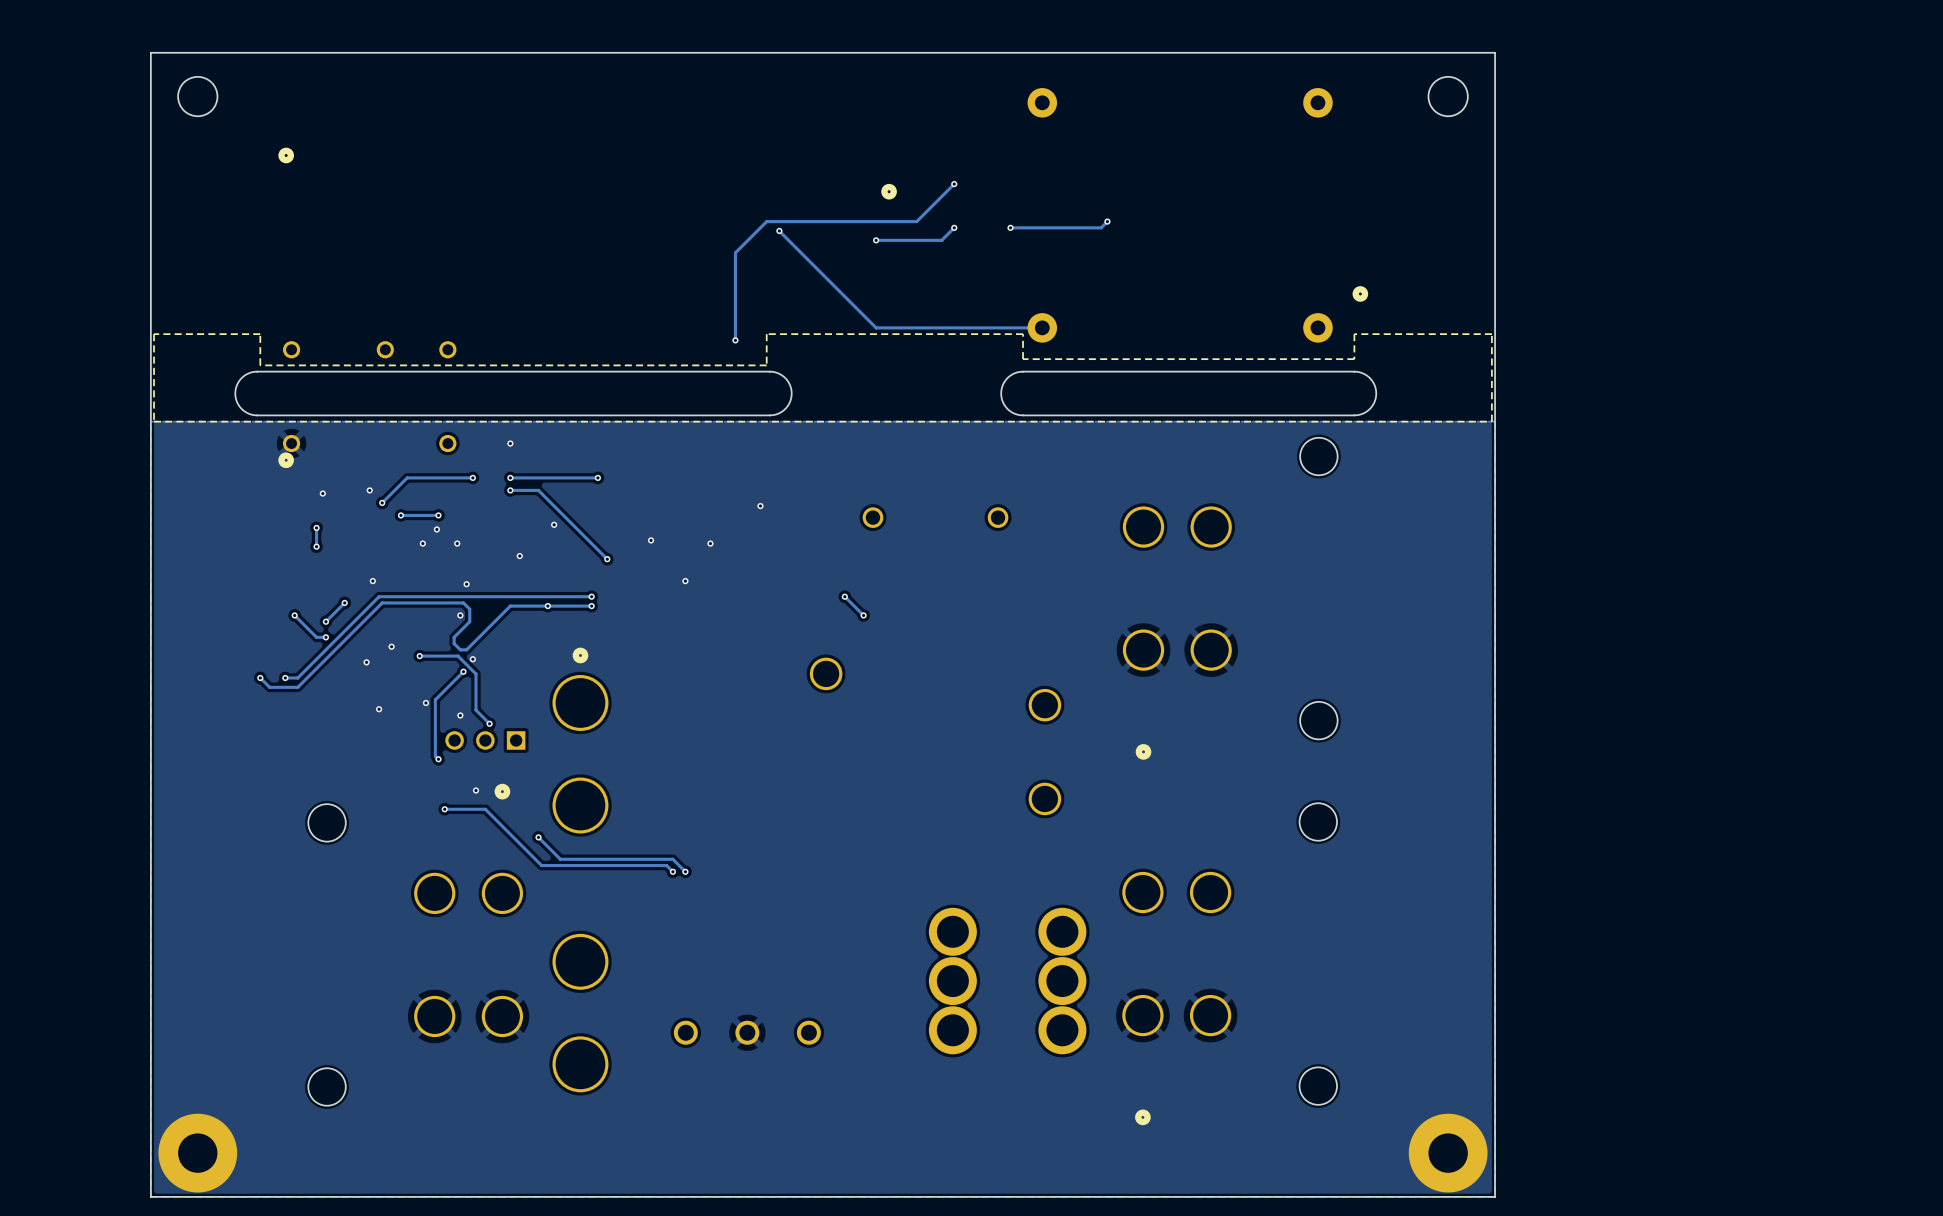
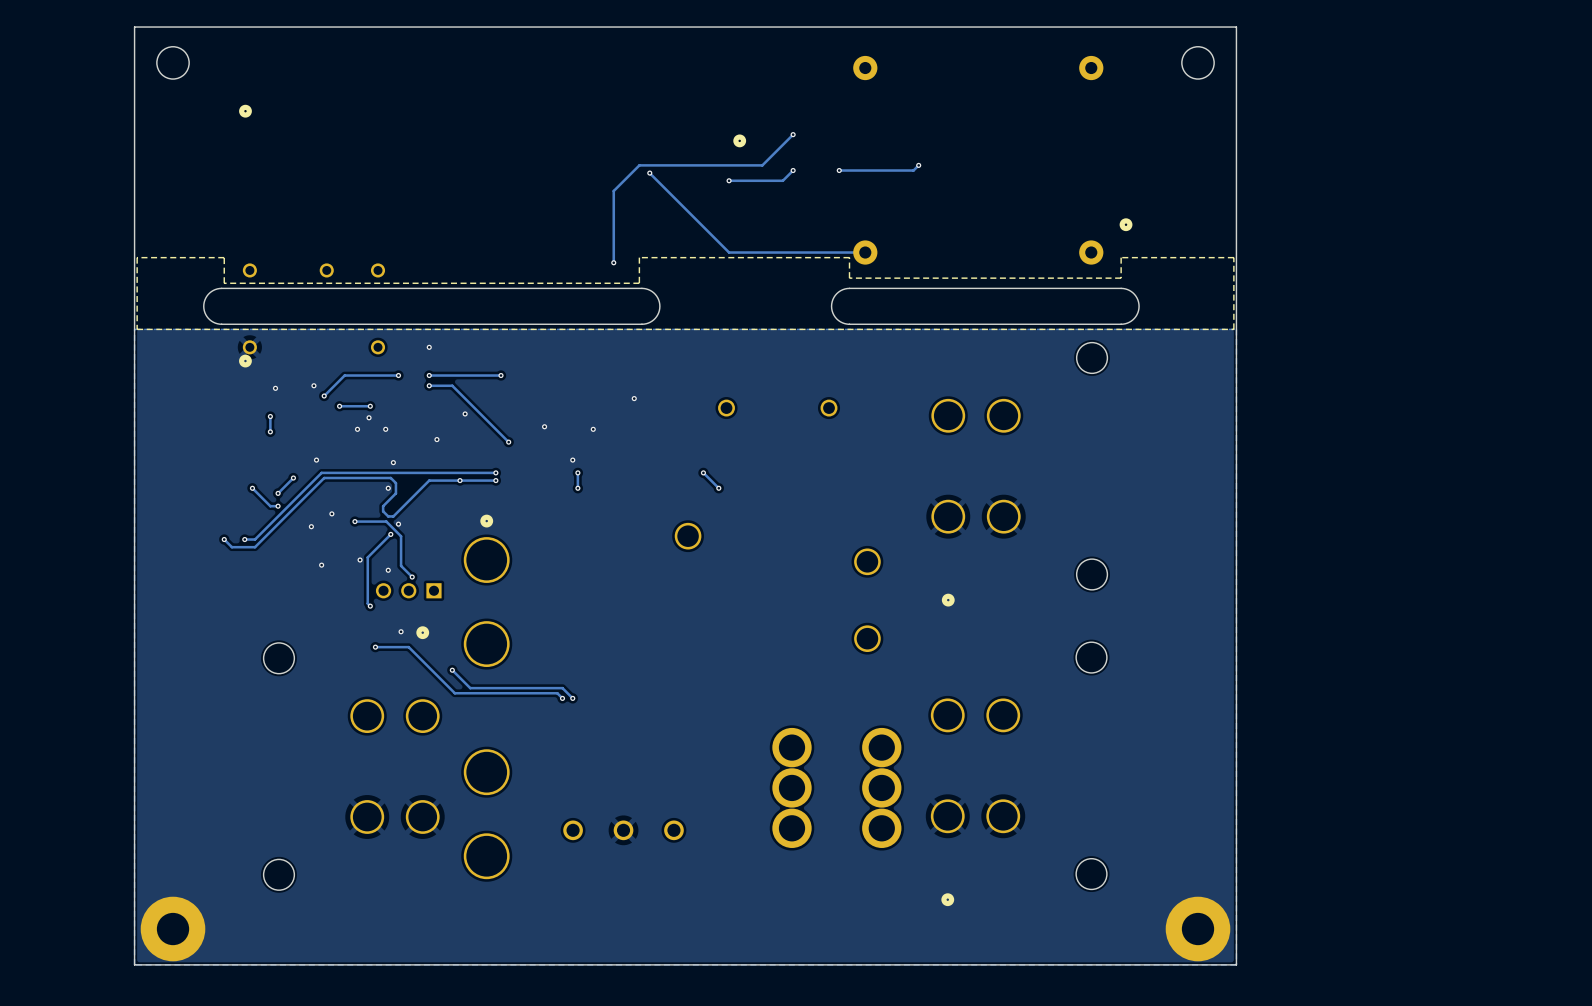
track: none -> (577, 472) (577, 488)
via: none -> (577, 472)
via: none -> (577, 488)

